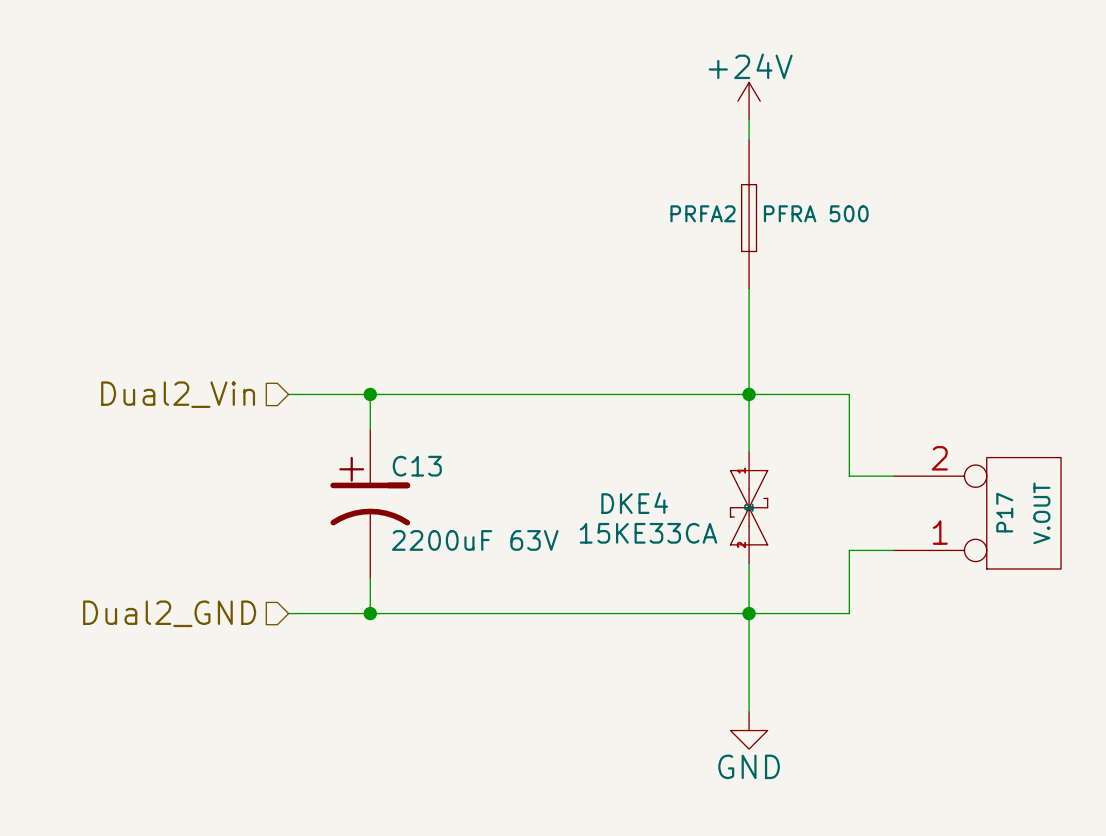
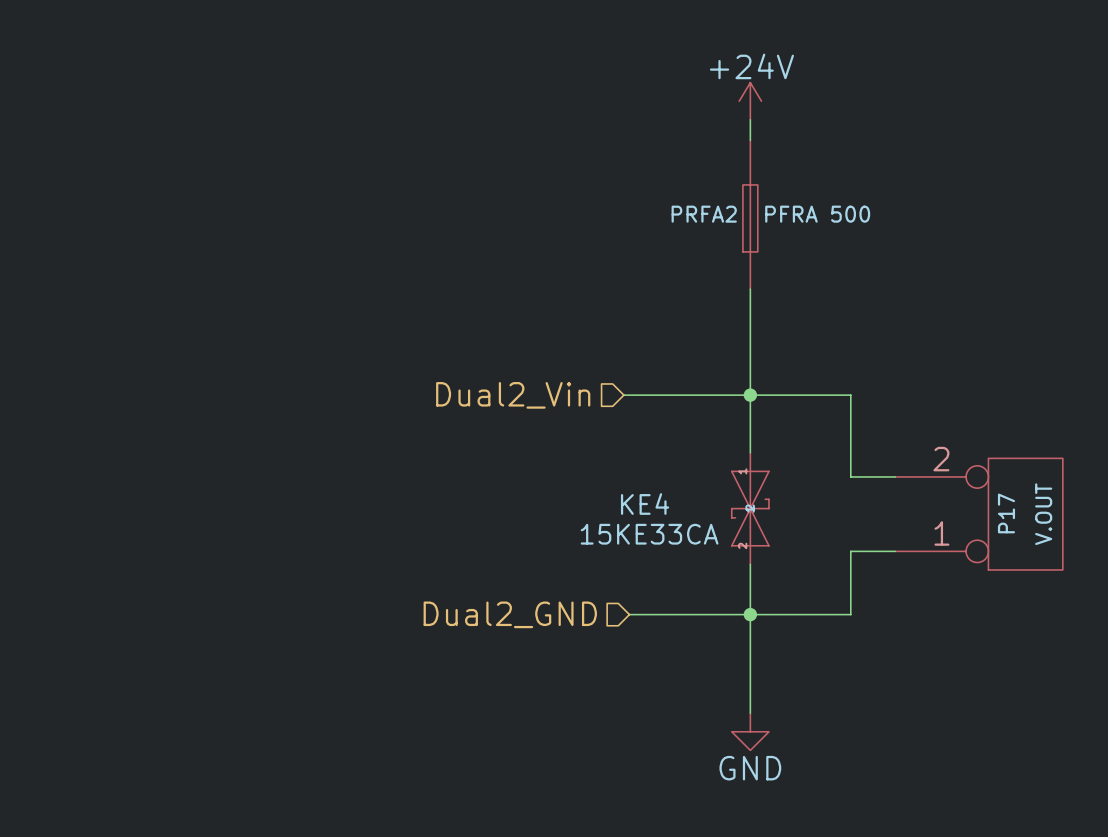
hierarchical label position: Dual2_Vin (178, 394) -> Dual2_Vin (513, 395)
wire: (288, 394) (622, 394) -> none
wire: (370, 394) (370, 429) -> none
junction: (370, 394) -> none
DKE4 name: DKE4 (634, 503) -> KE4 (645, 504)
C13: 2200uF 63V (370, 504) -> none
wire: (370, 578) (370, 613) -> none
hierarchical label position: Dual2_GND (169, 613) -> Dual2_GND (510, 614)
wire: (288, 613) (628, 613) -> none
junction: (370, 613) -> none

